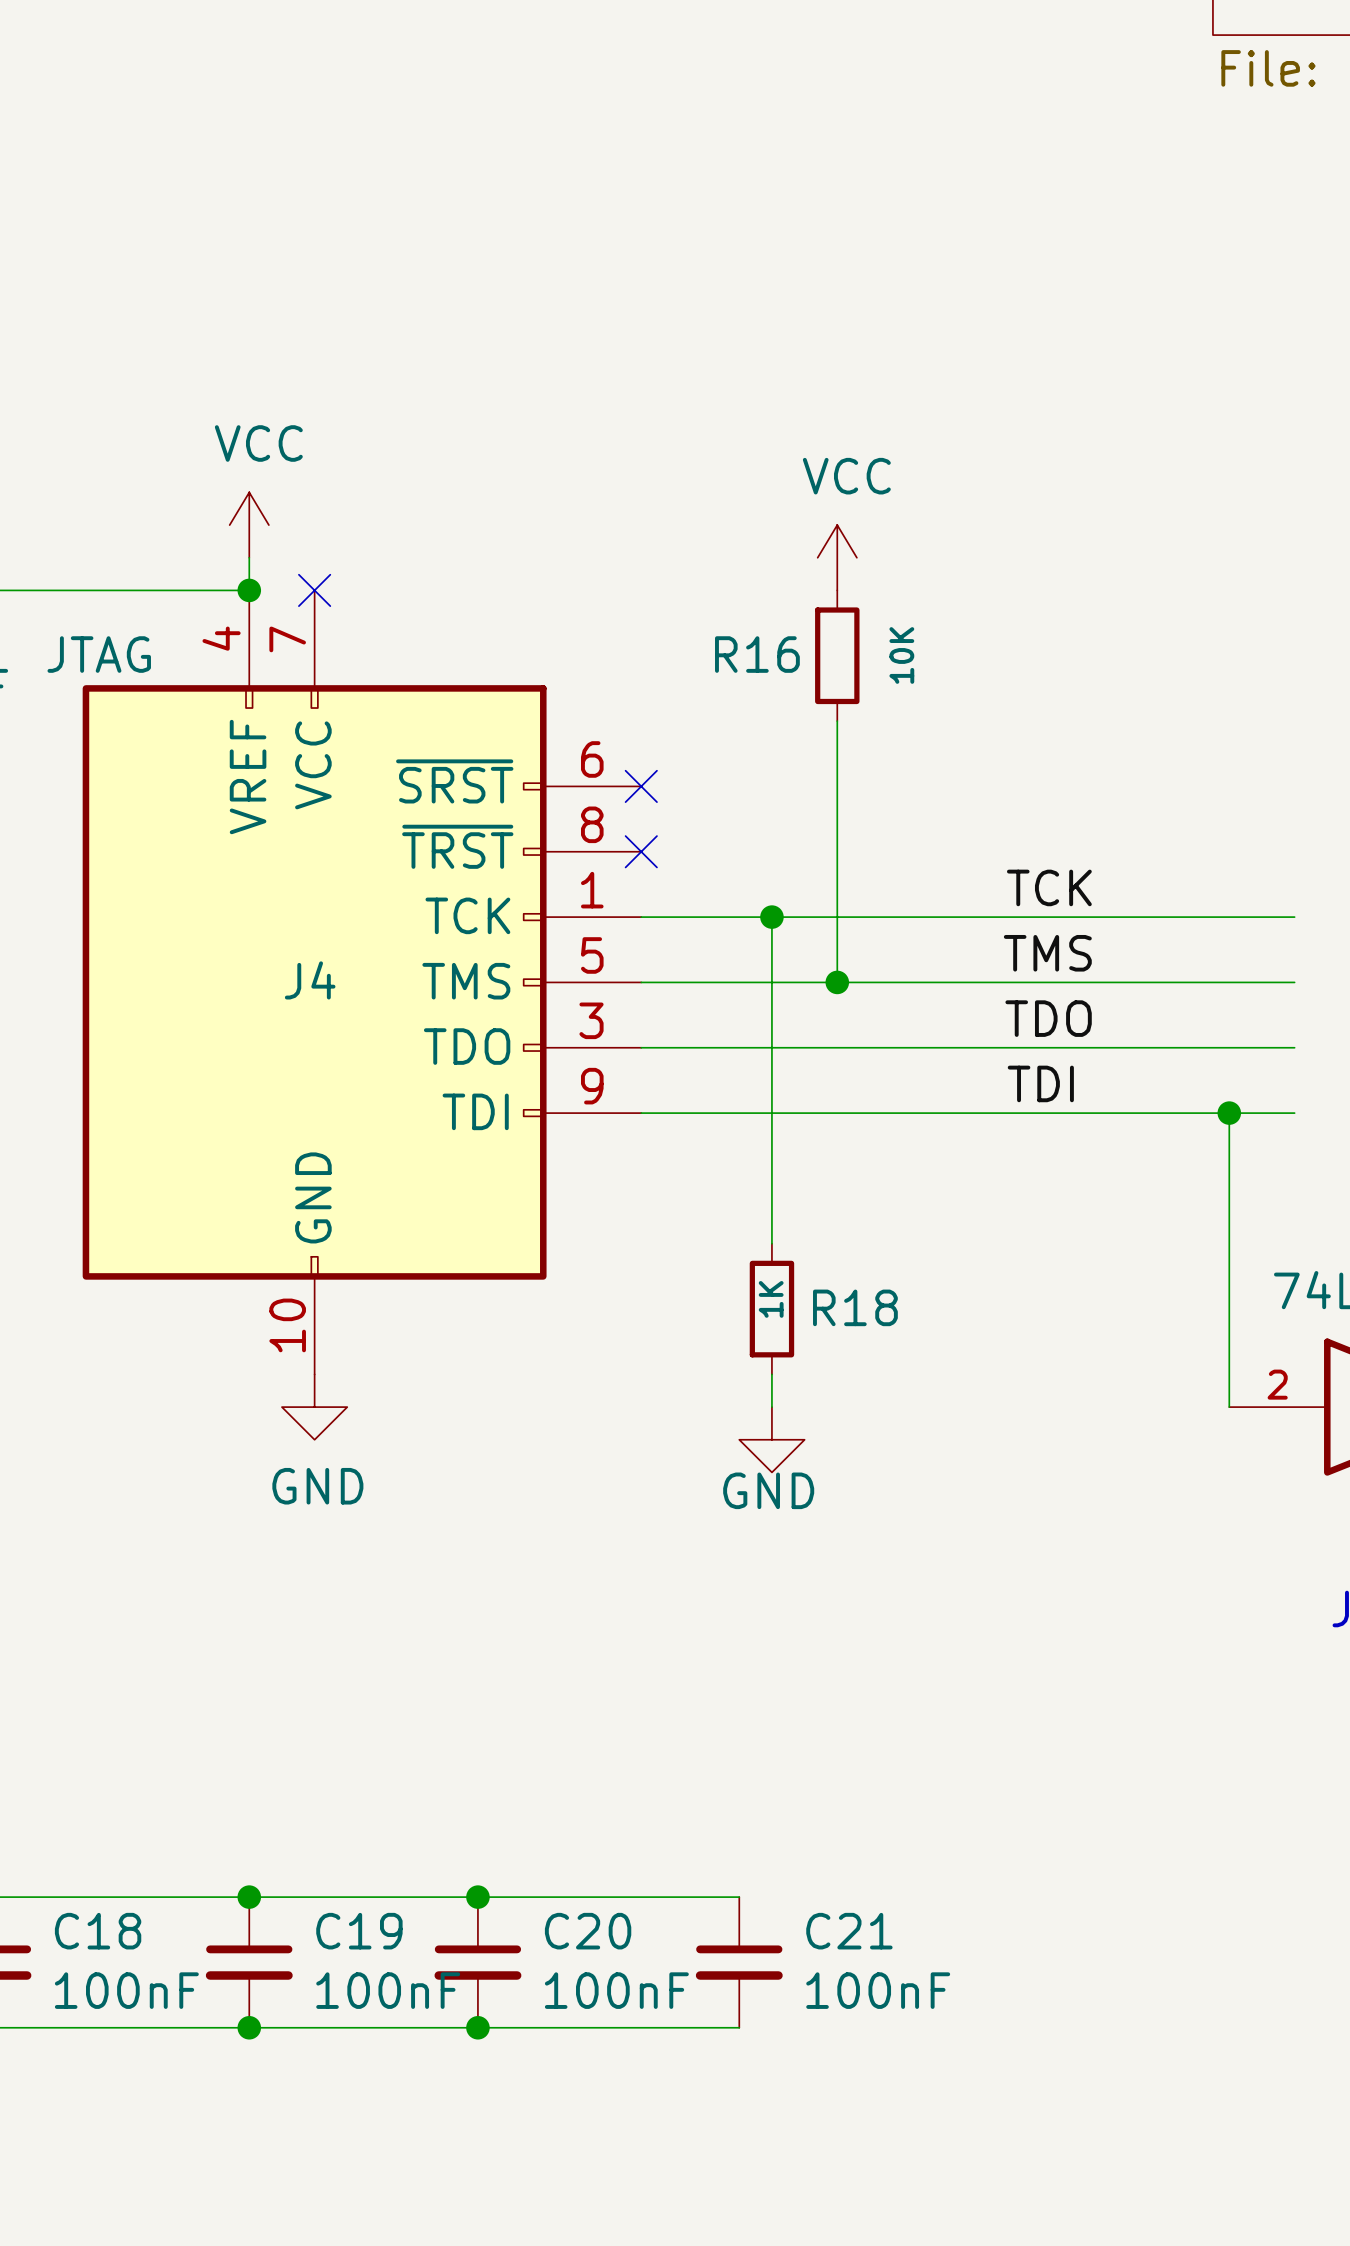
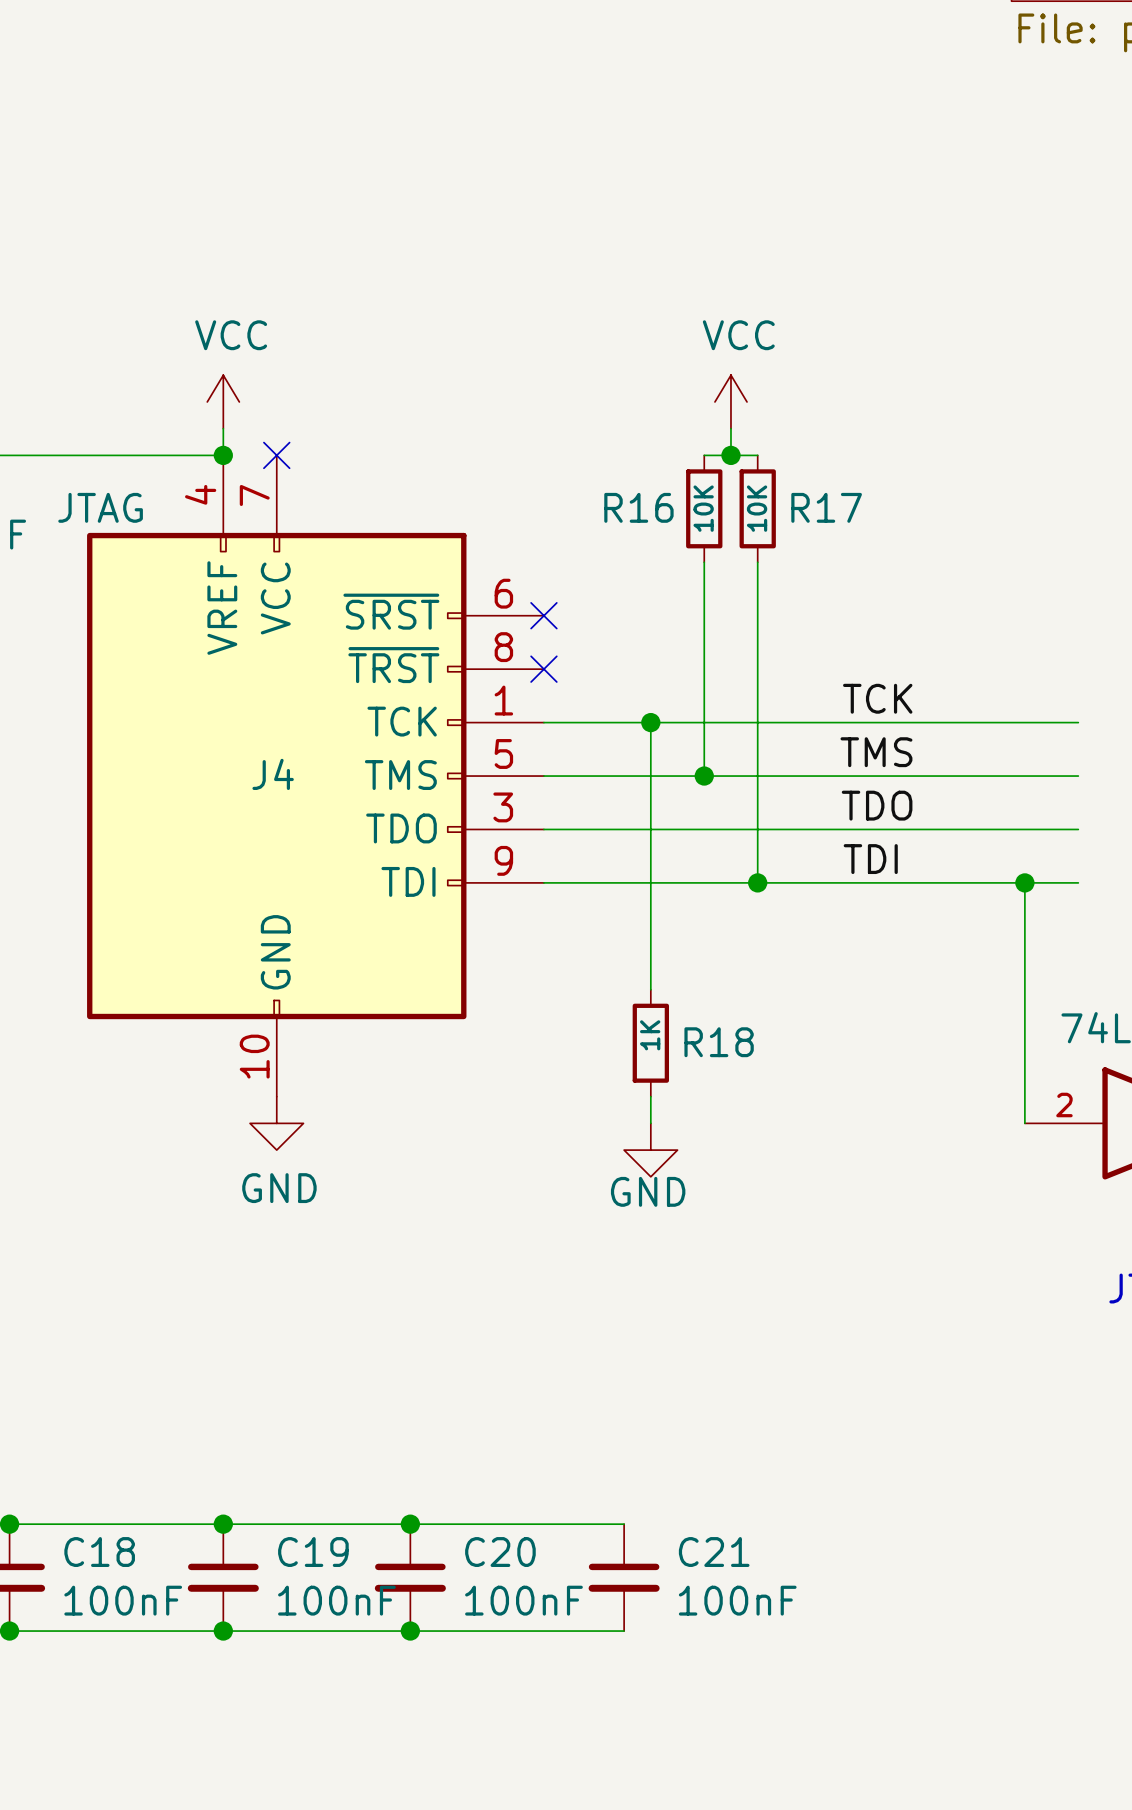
power symbol position: VCC (837, 557) -> VCC (730, 401)
wire: none -> (730, 428) (730, 455)
wire: none -> (704, 455) (757, 455)
junction: none -> (730, 455)
R17: none -> 10K (757, 508)
wire: none -> (757, 562) (757, 882)
junction: none -> (757, 882)

